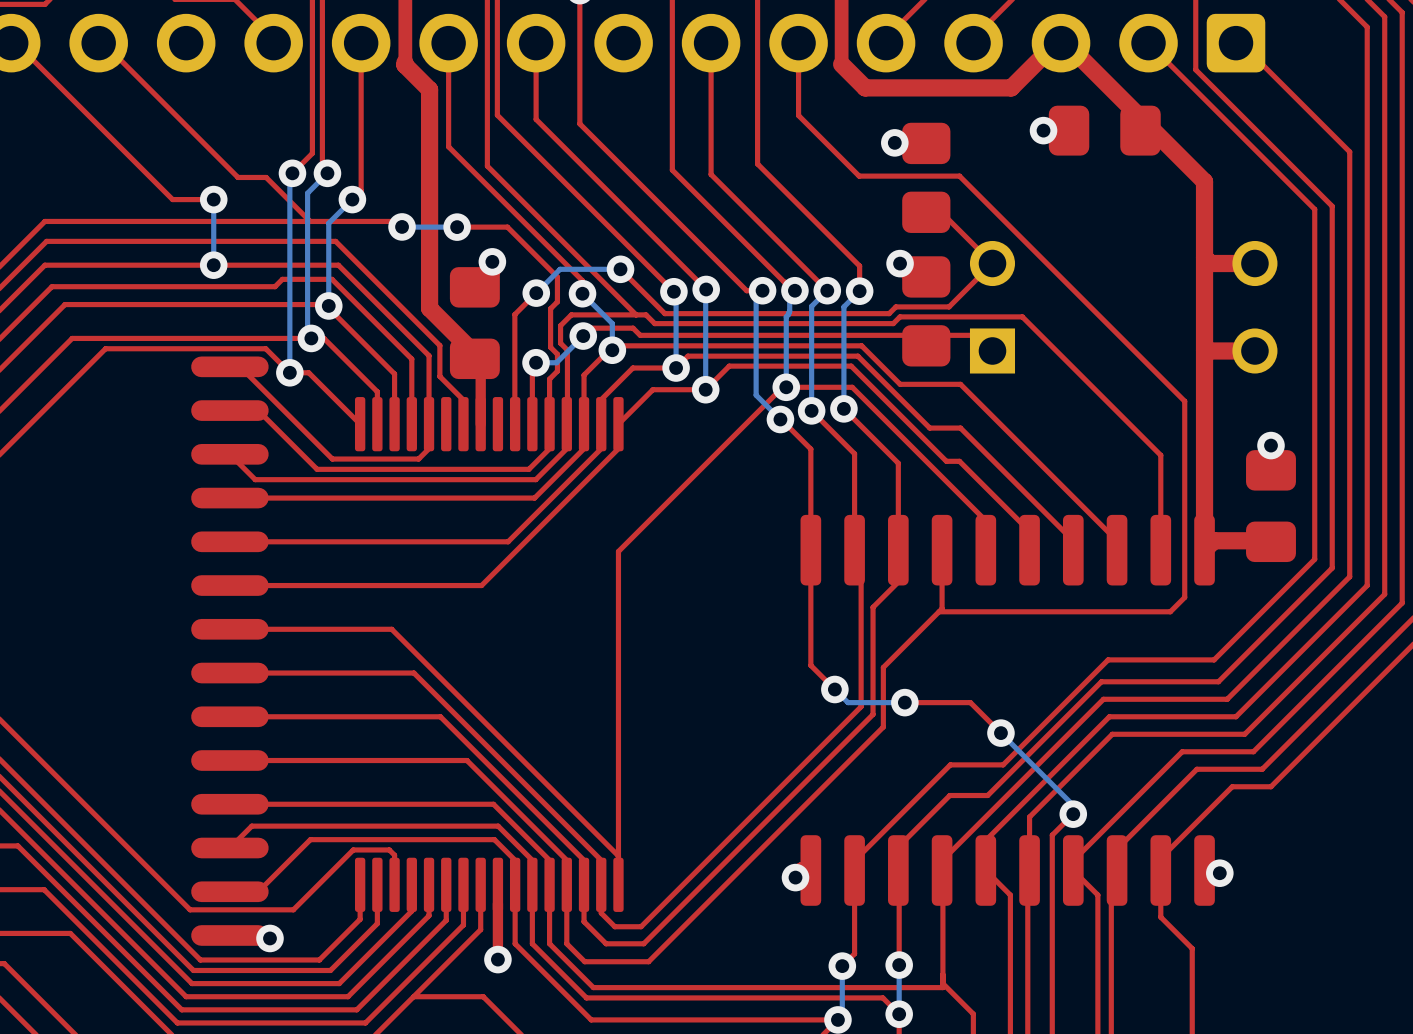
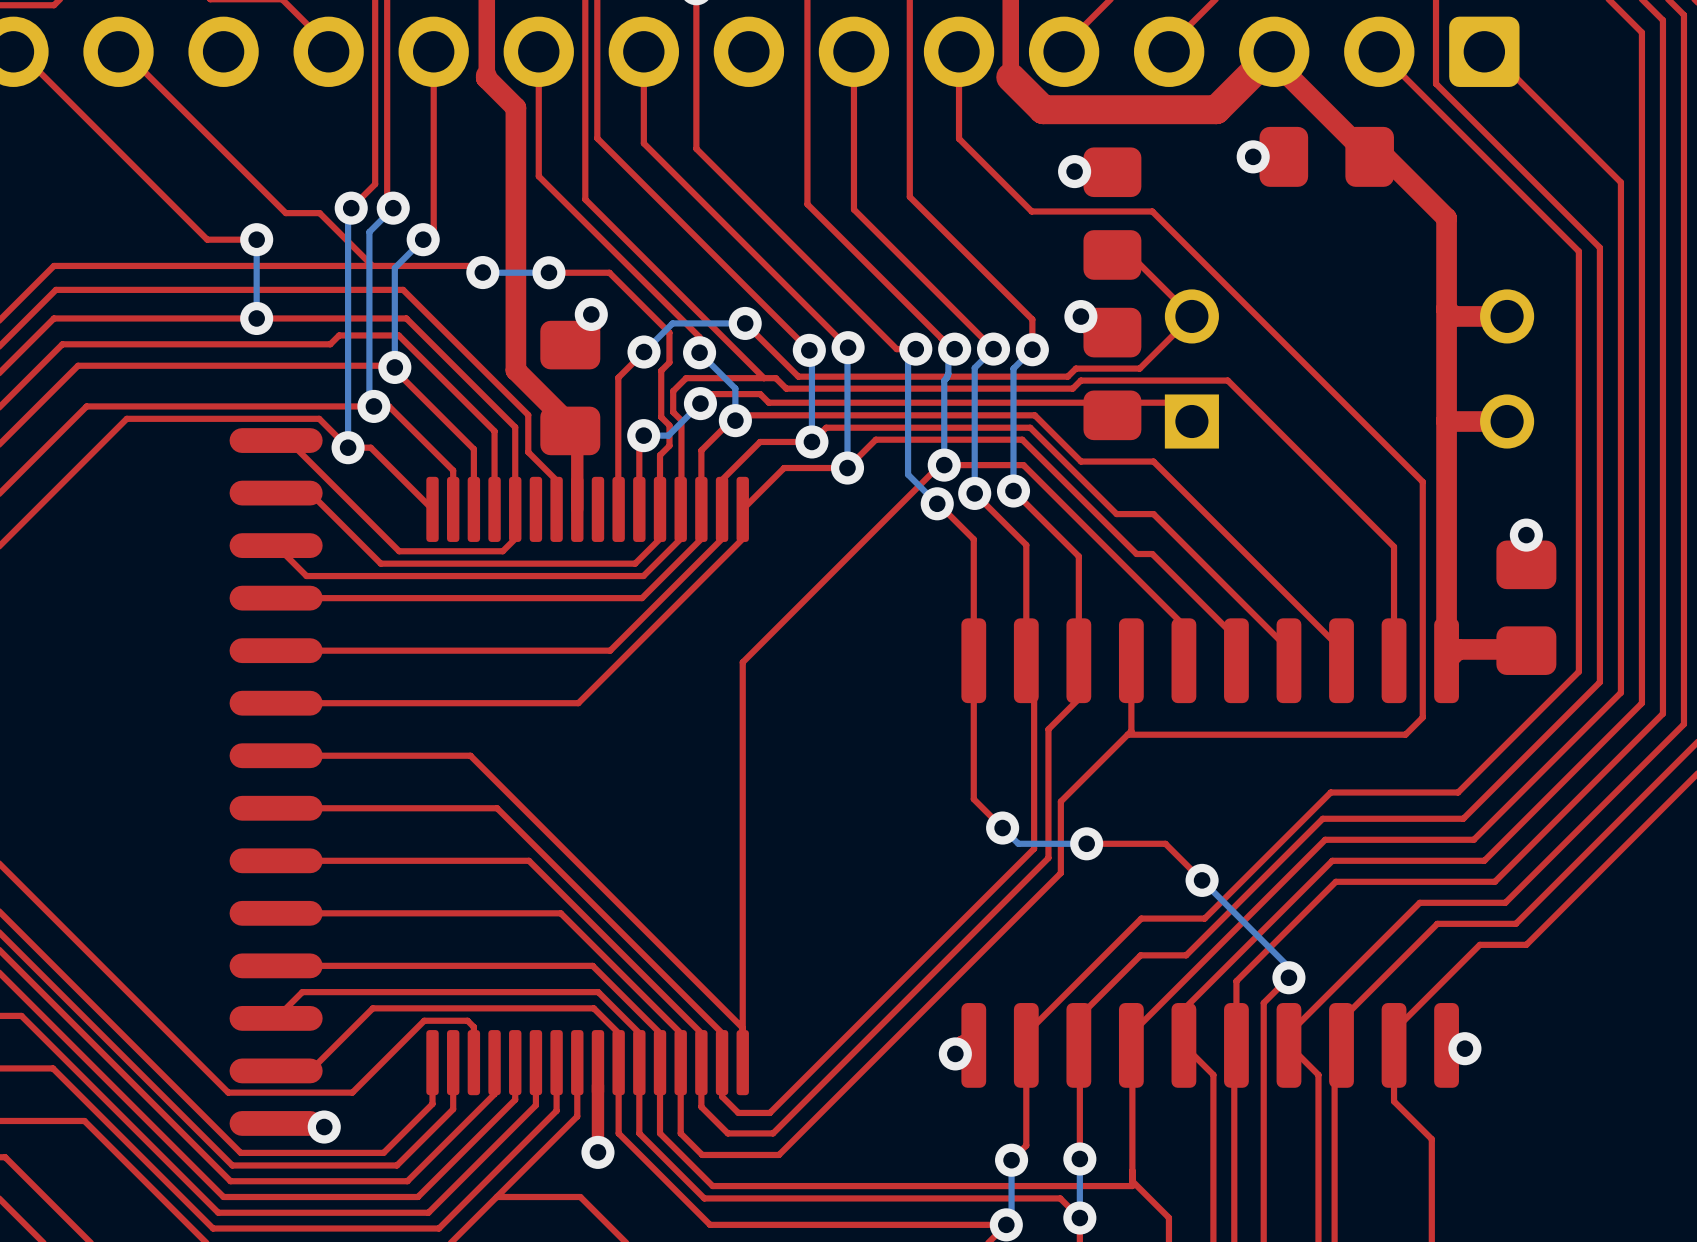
top track: none -> (1274, 61) (1369, 156) (1385, 156)
top track width: thin (841, 64) (865, 87) -> thick (1010, 77) (1039, 105)
top track: (865, 87) (1011, 87) (1061, 38) (1153, 130) -> (1039, 105) (1043, 109) (1216, 109) (1274, 51)

